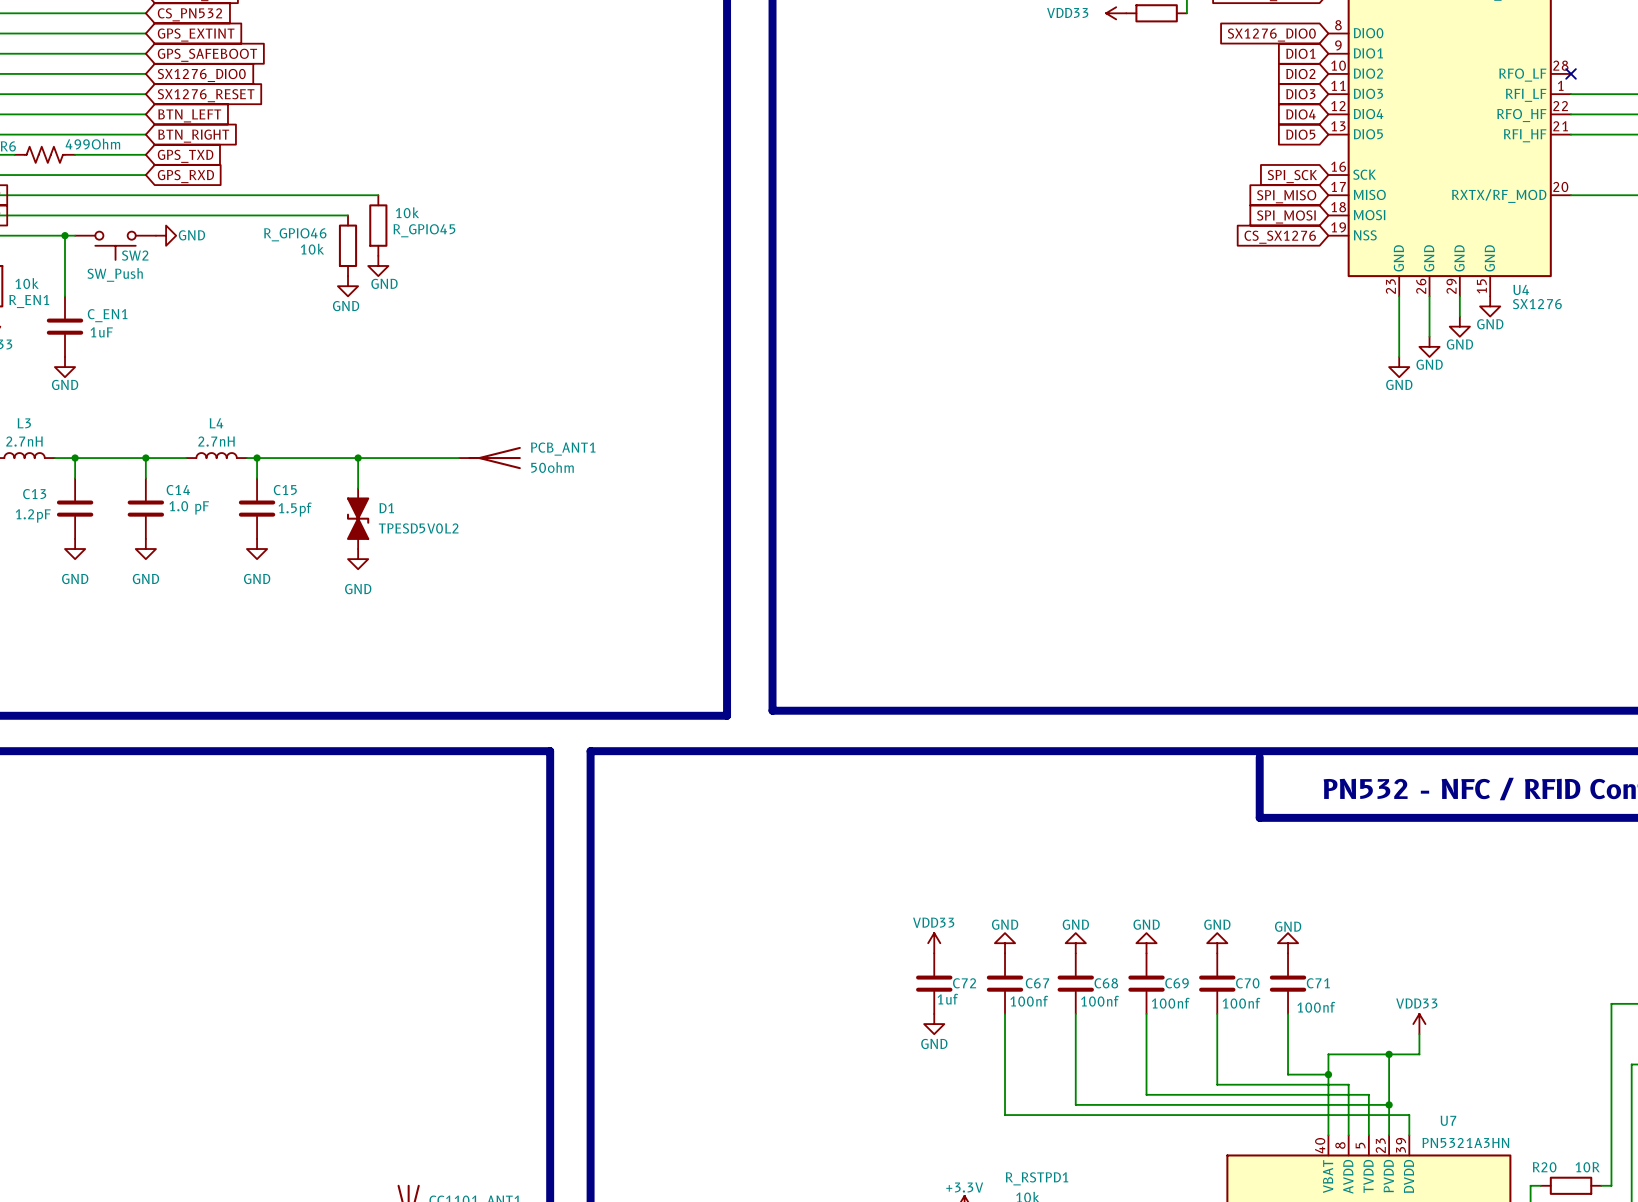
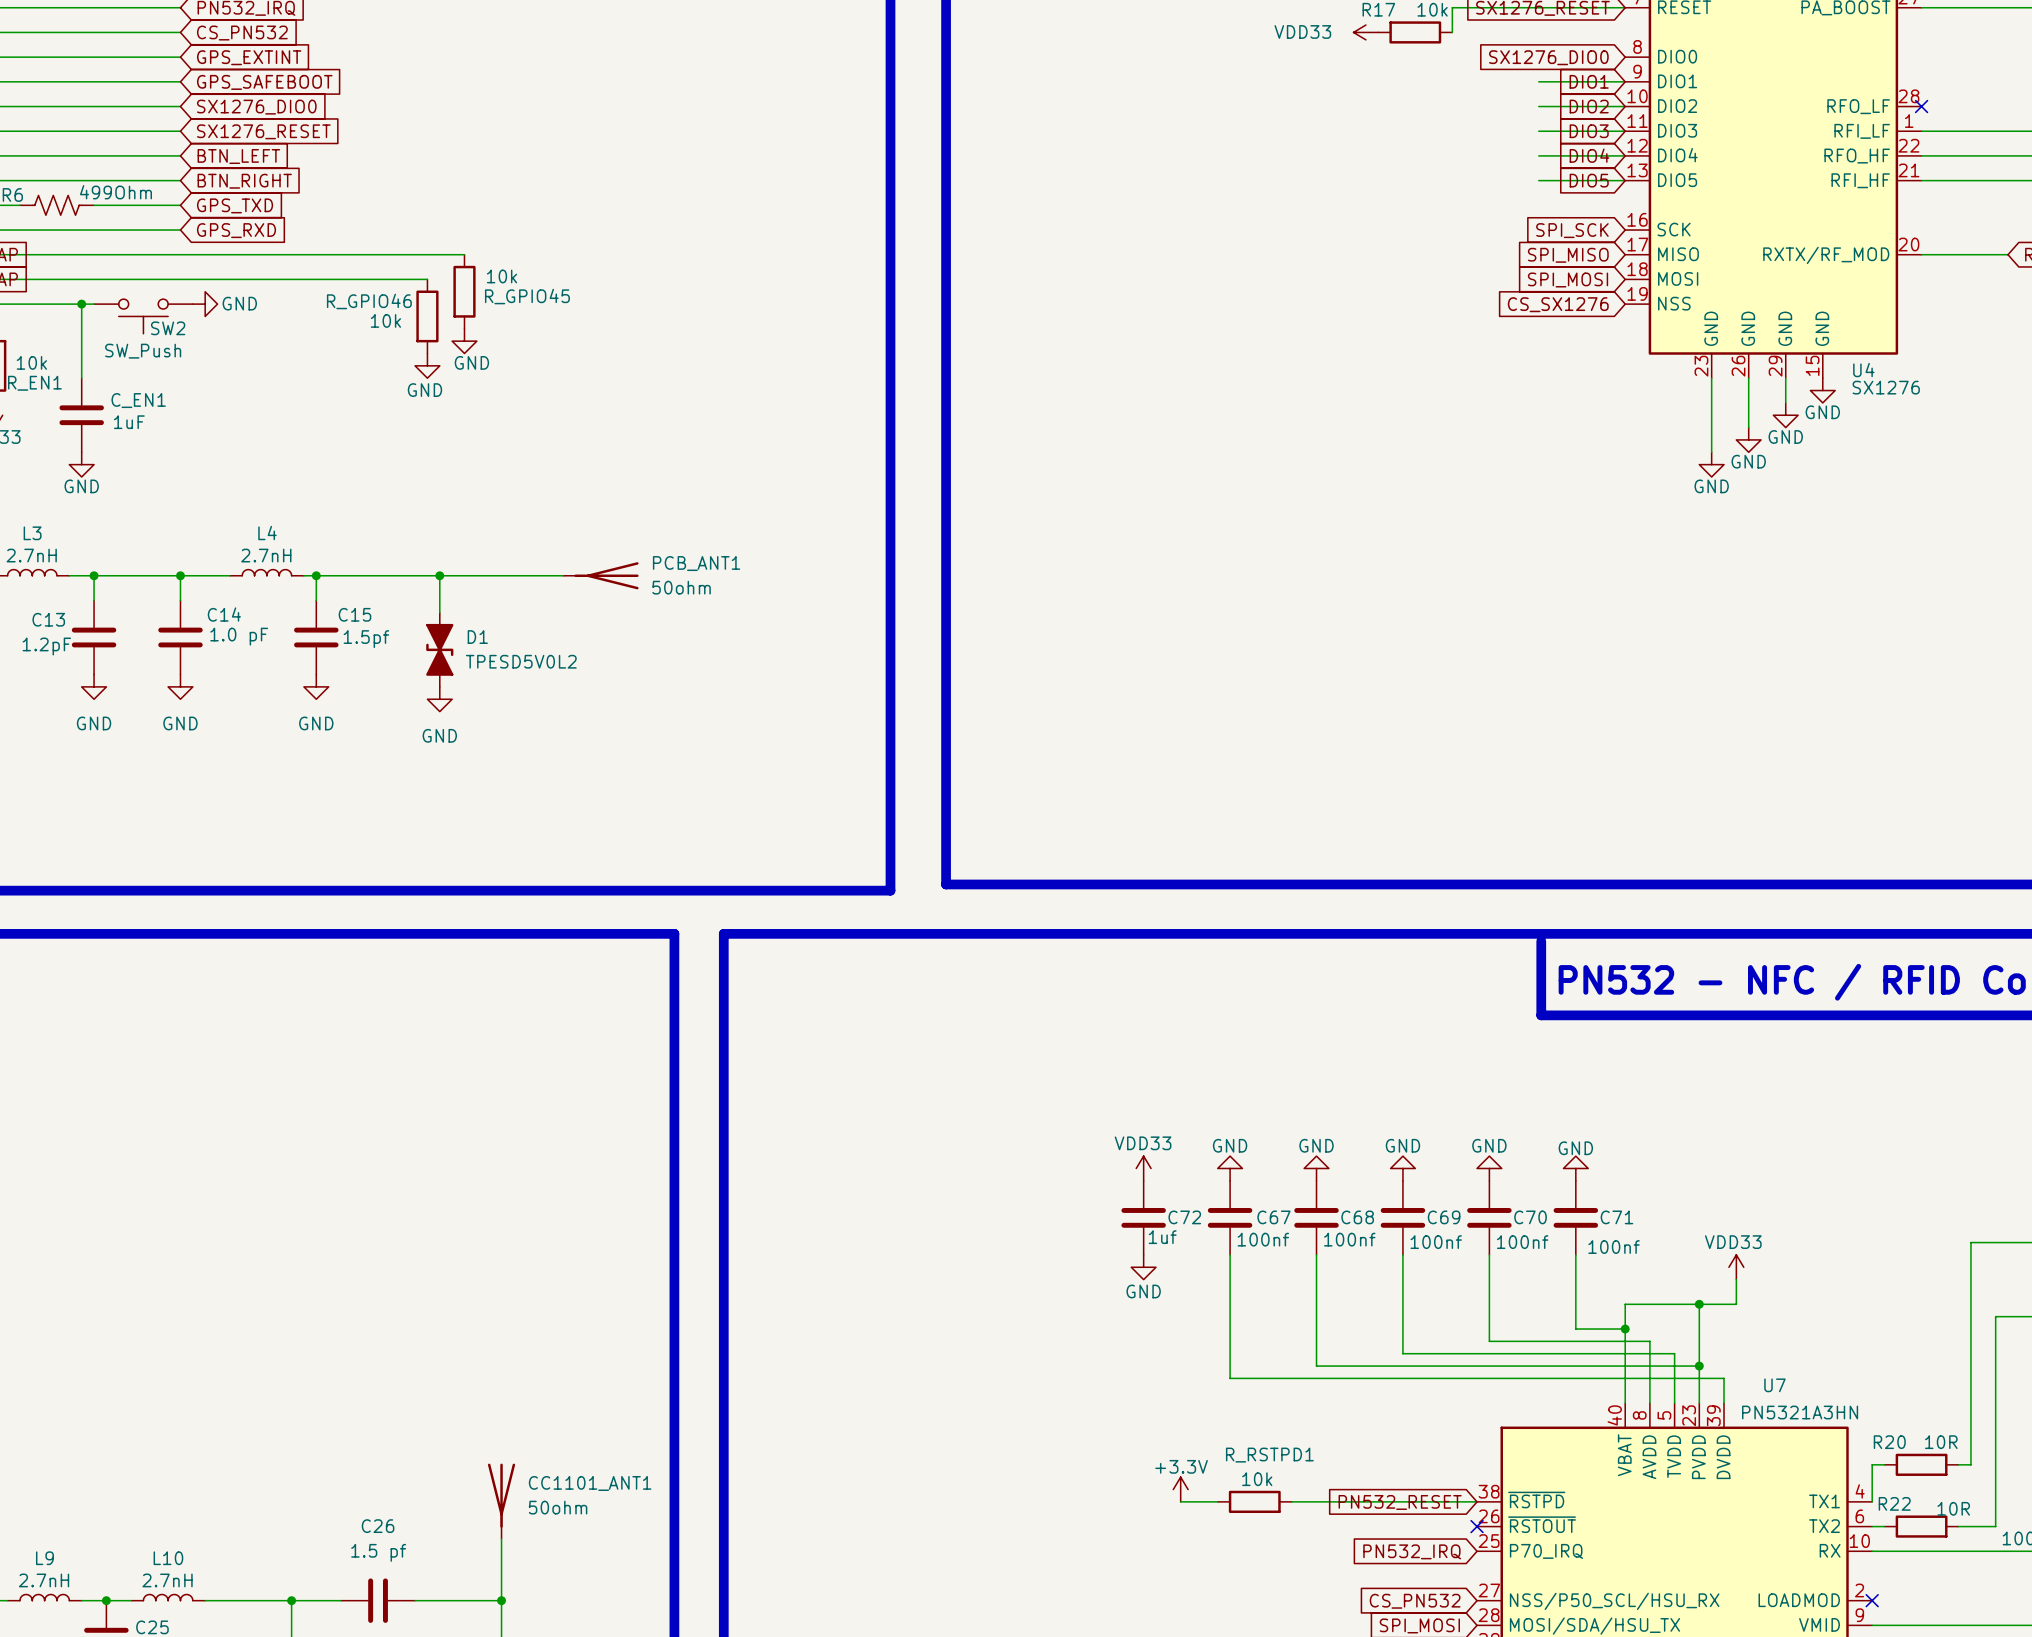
wire: none -> (1538, 81) (1625, 81)
wire: none -> (1538, 106) (1625, 106)
wire: none -> (1538, 131) (1625, 131)
wire: none -> (1538, 155) (1625, 155)
wire: none -> (1538, 180) (1625, 180)

